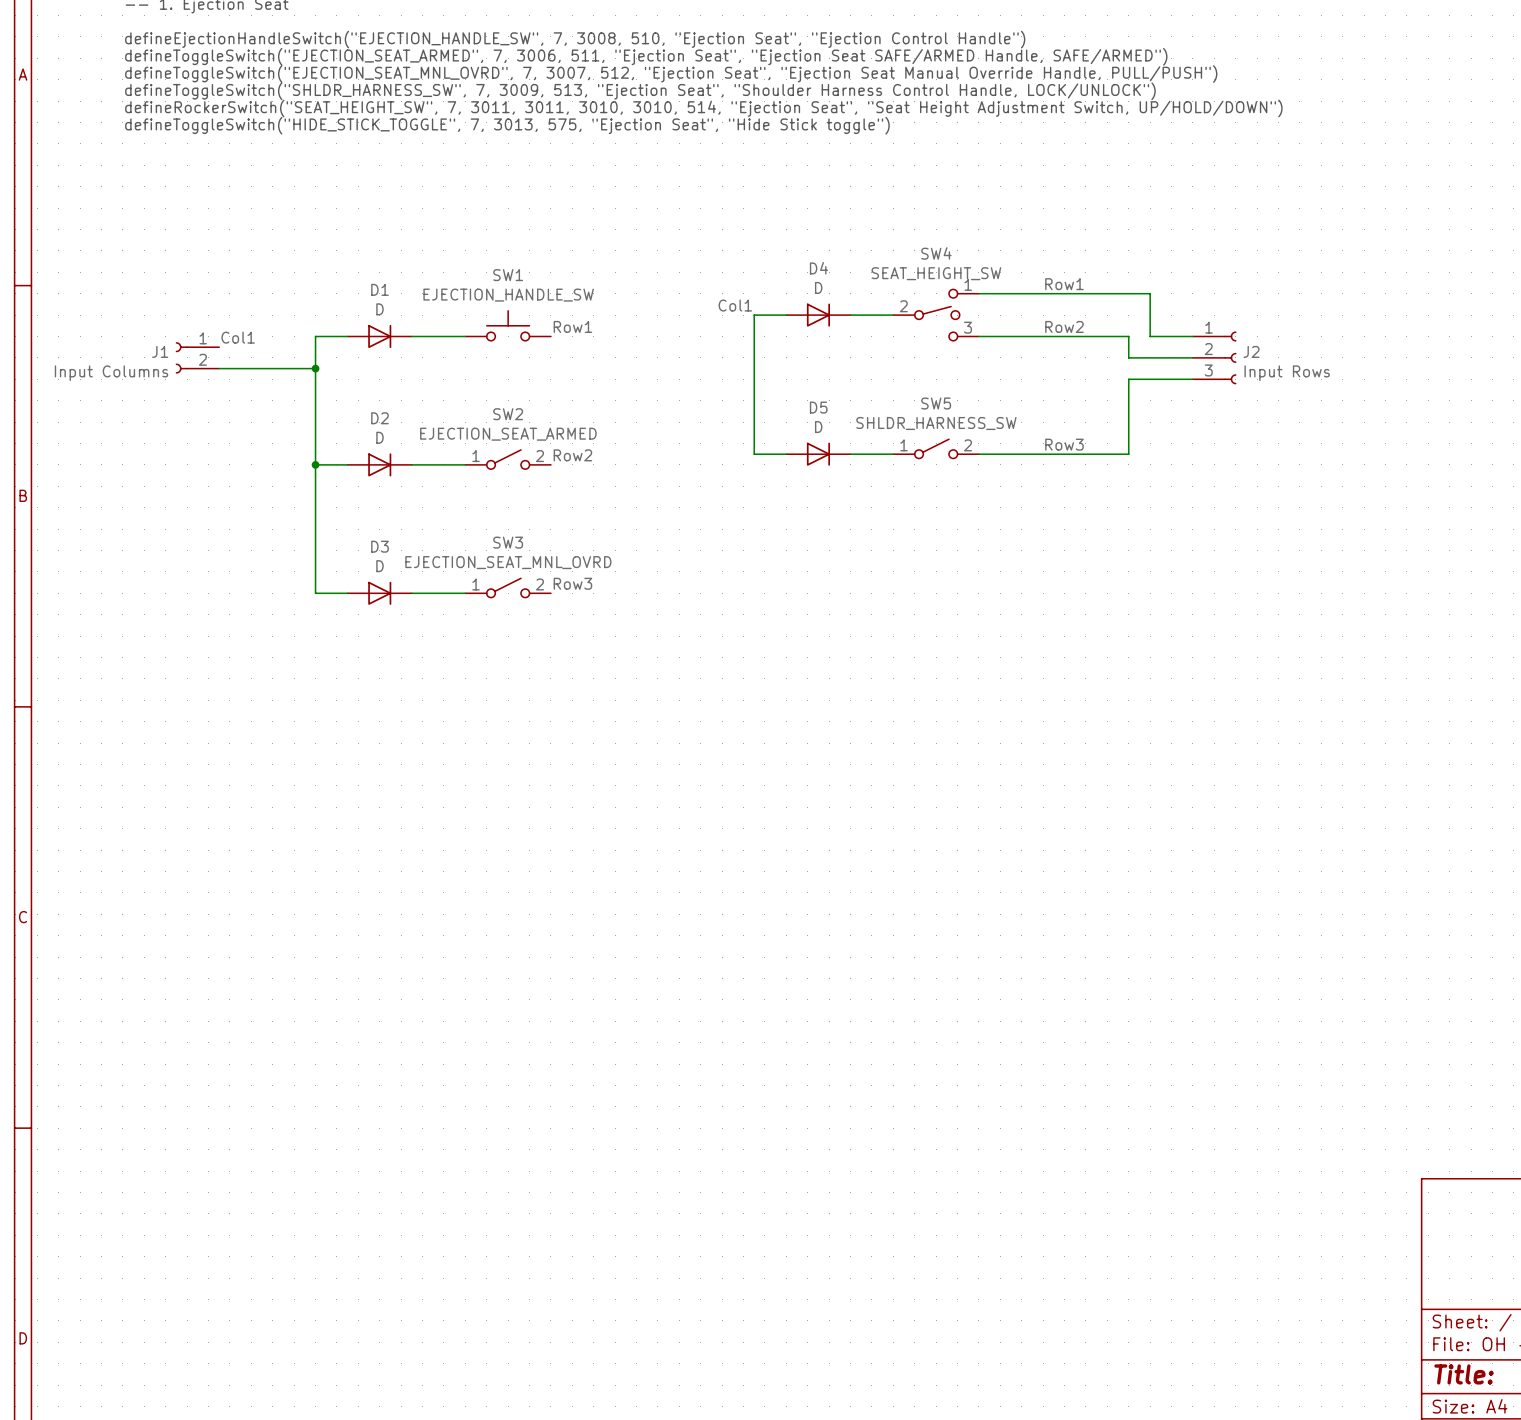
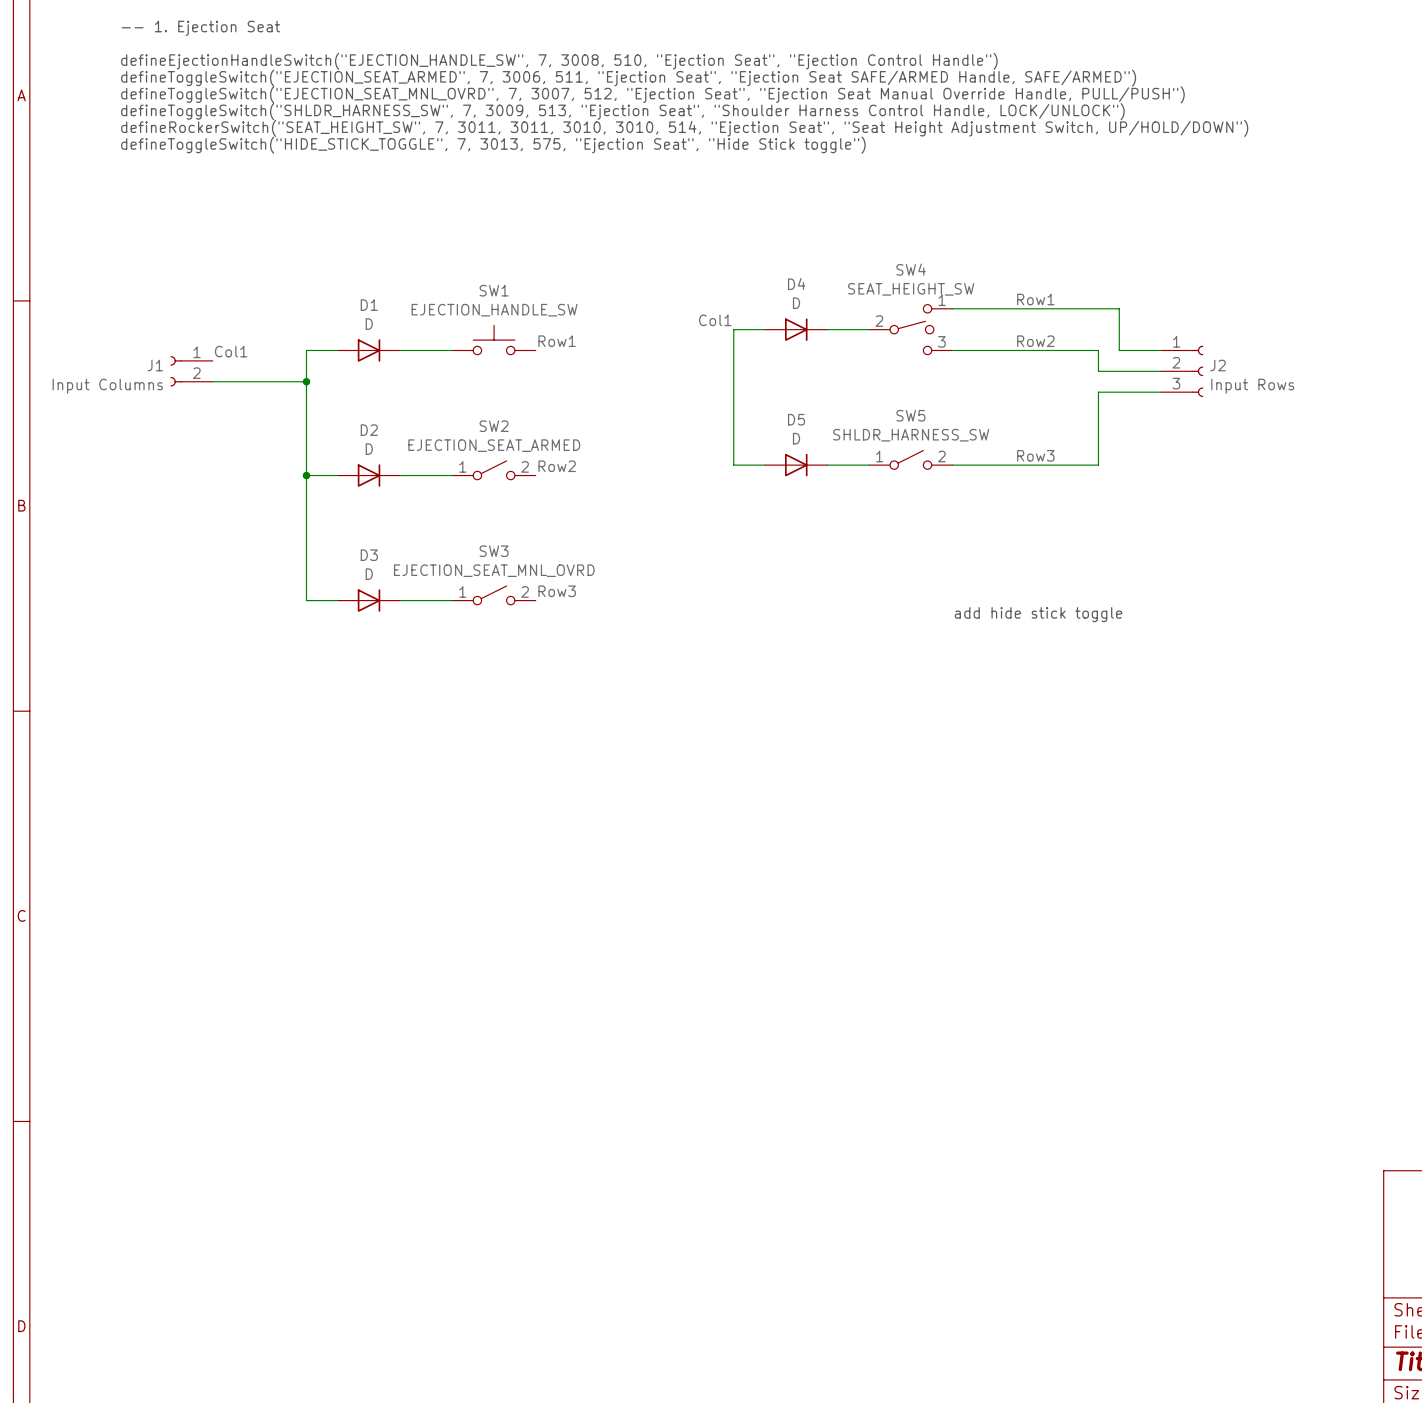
text: none -> add hide stick toggle (1038, 614)

